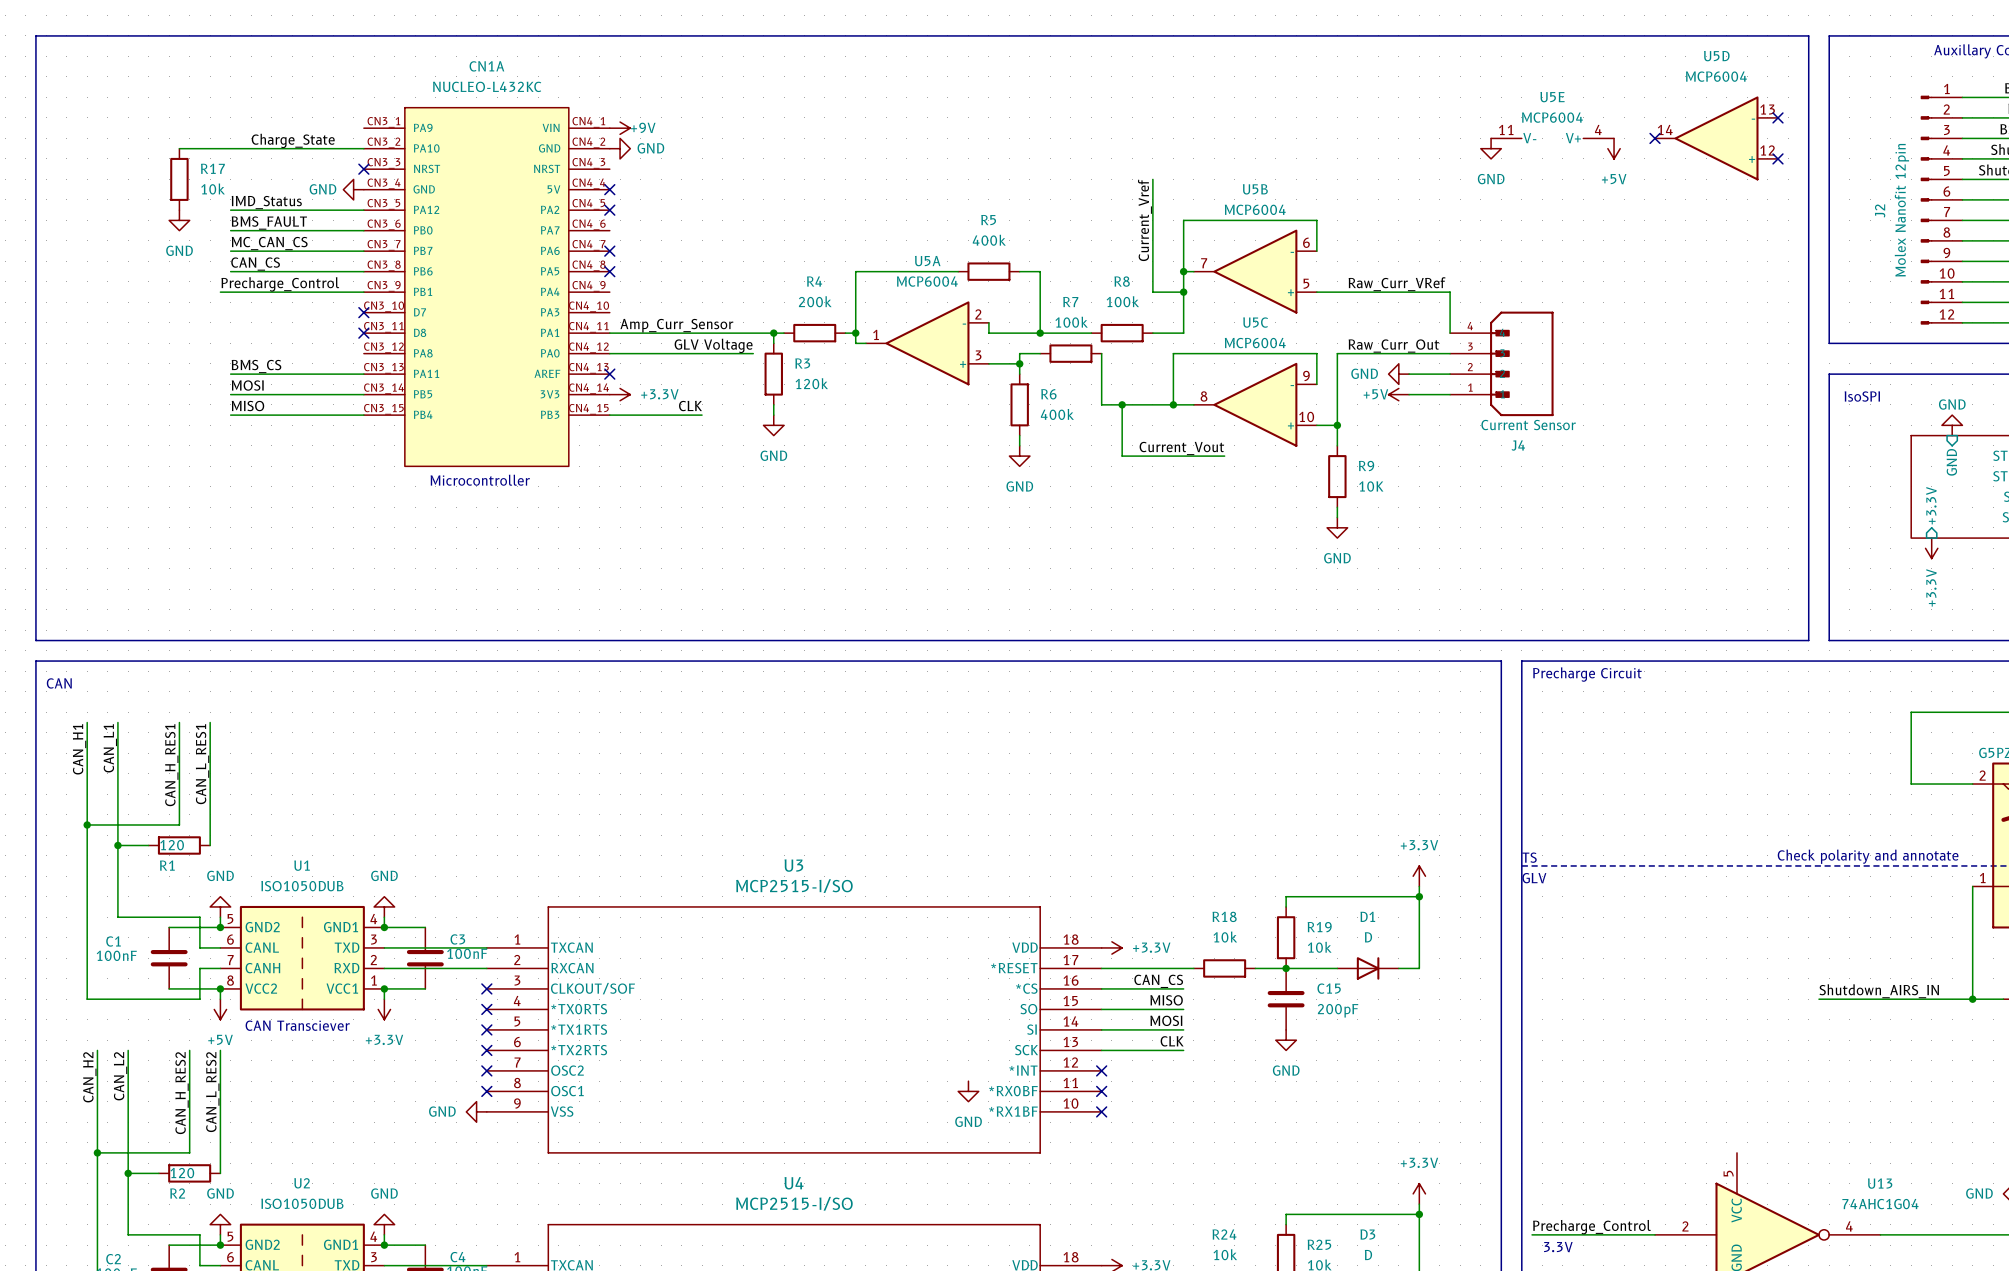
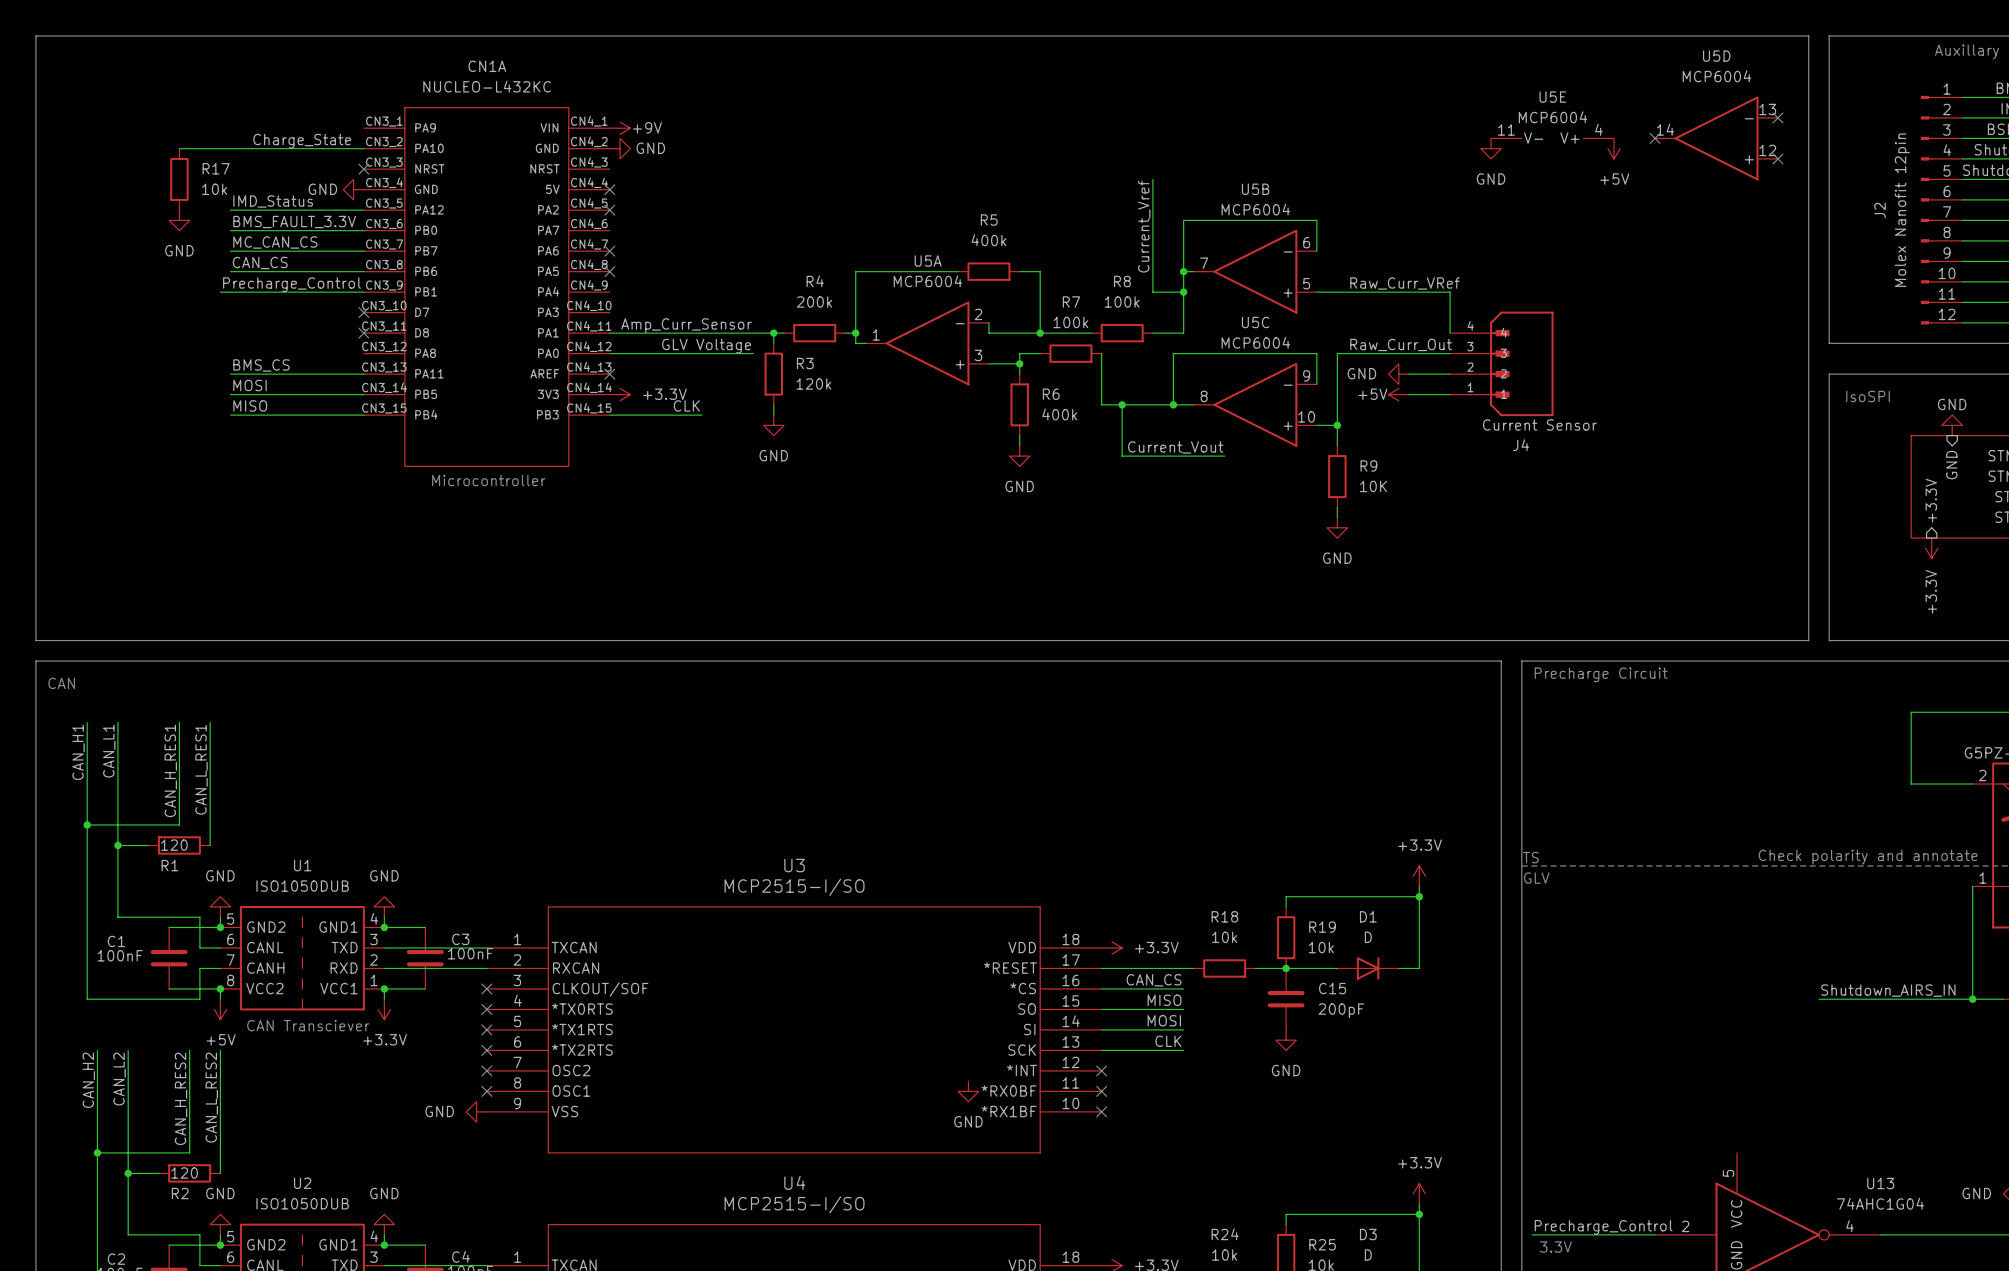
label: BMS_FAULT (269, 223) -> BMS_FAULT_3.3V (294, 222)

